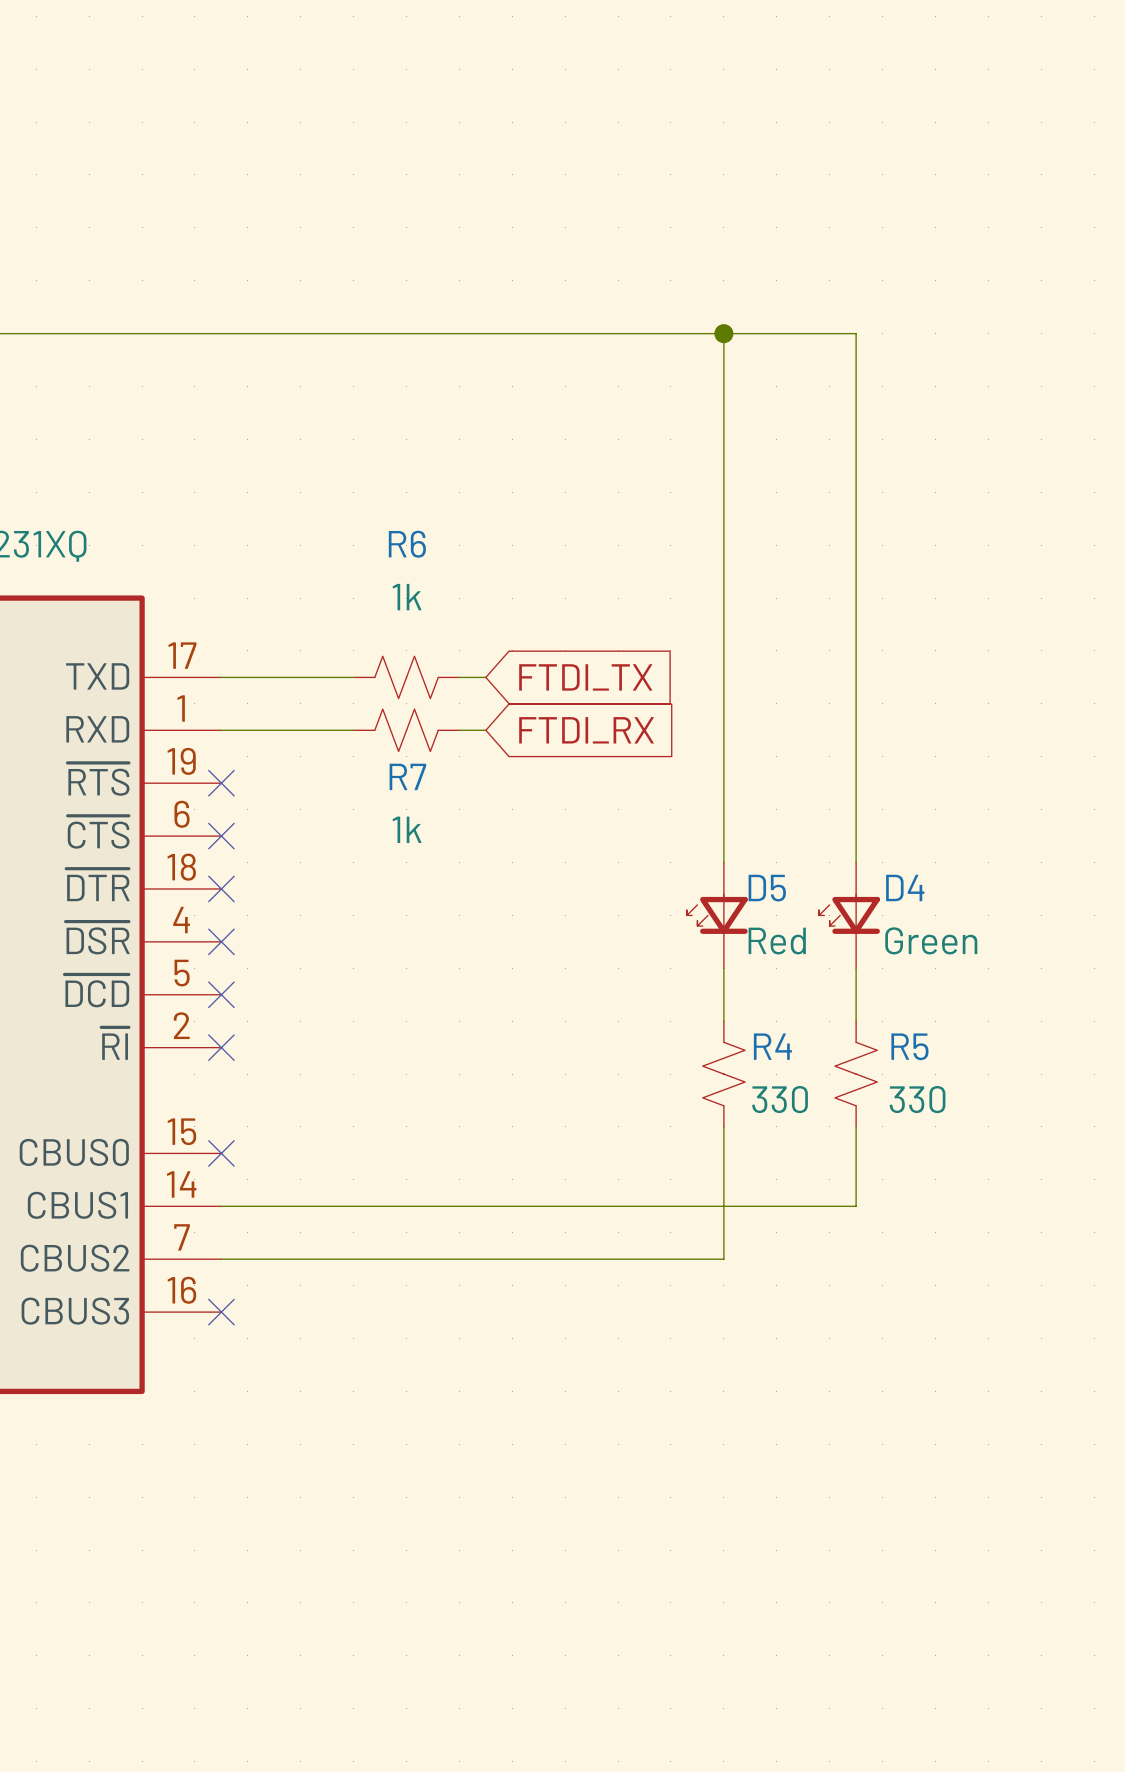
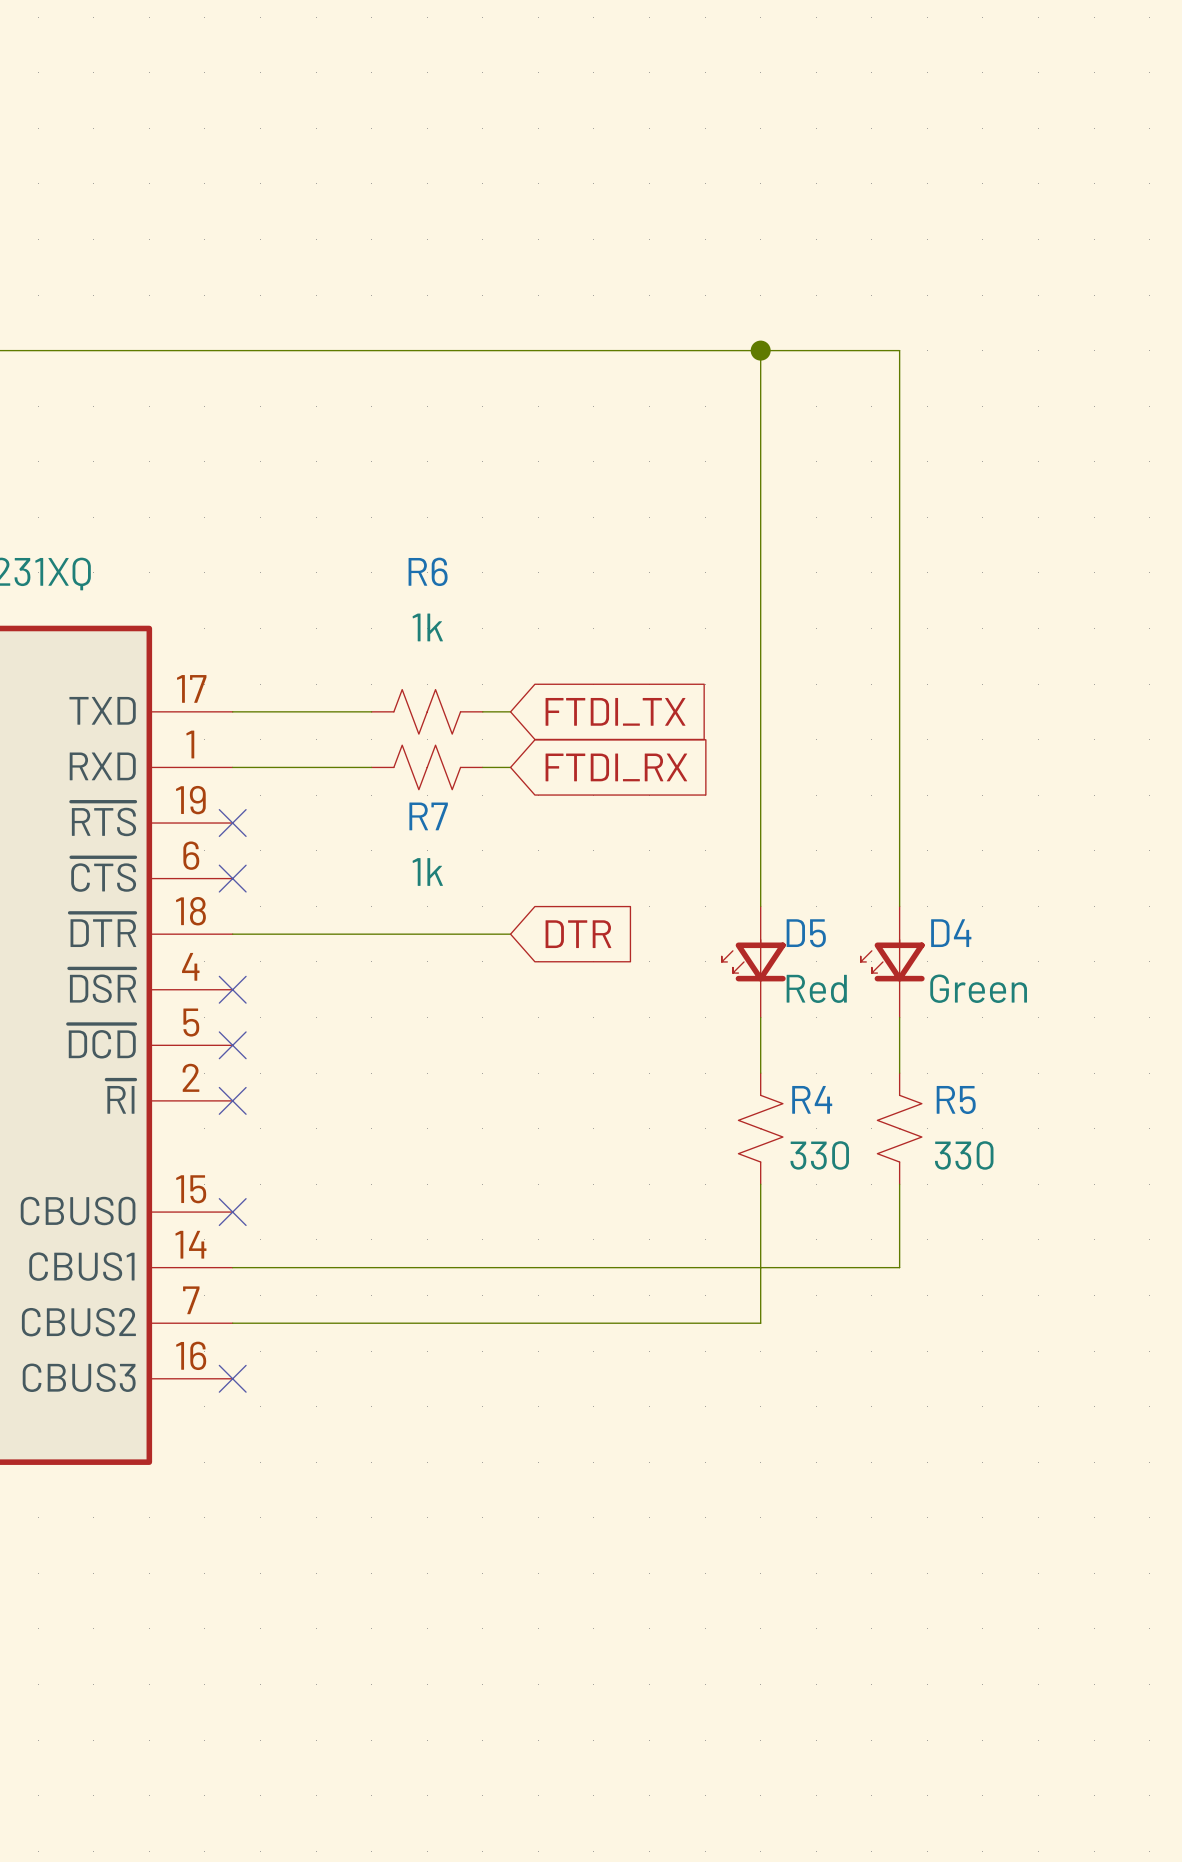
wire: none -> (232, 934) (510, 934)
no-connect mark: (221, 888) -> none
global label: none -> DTR (578, 934)

